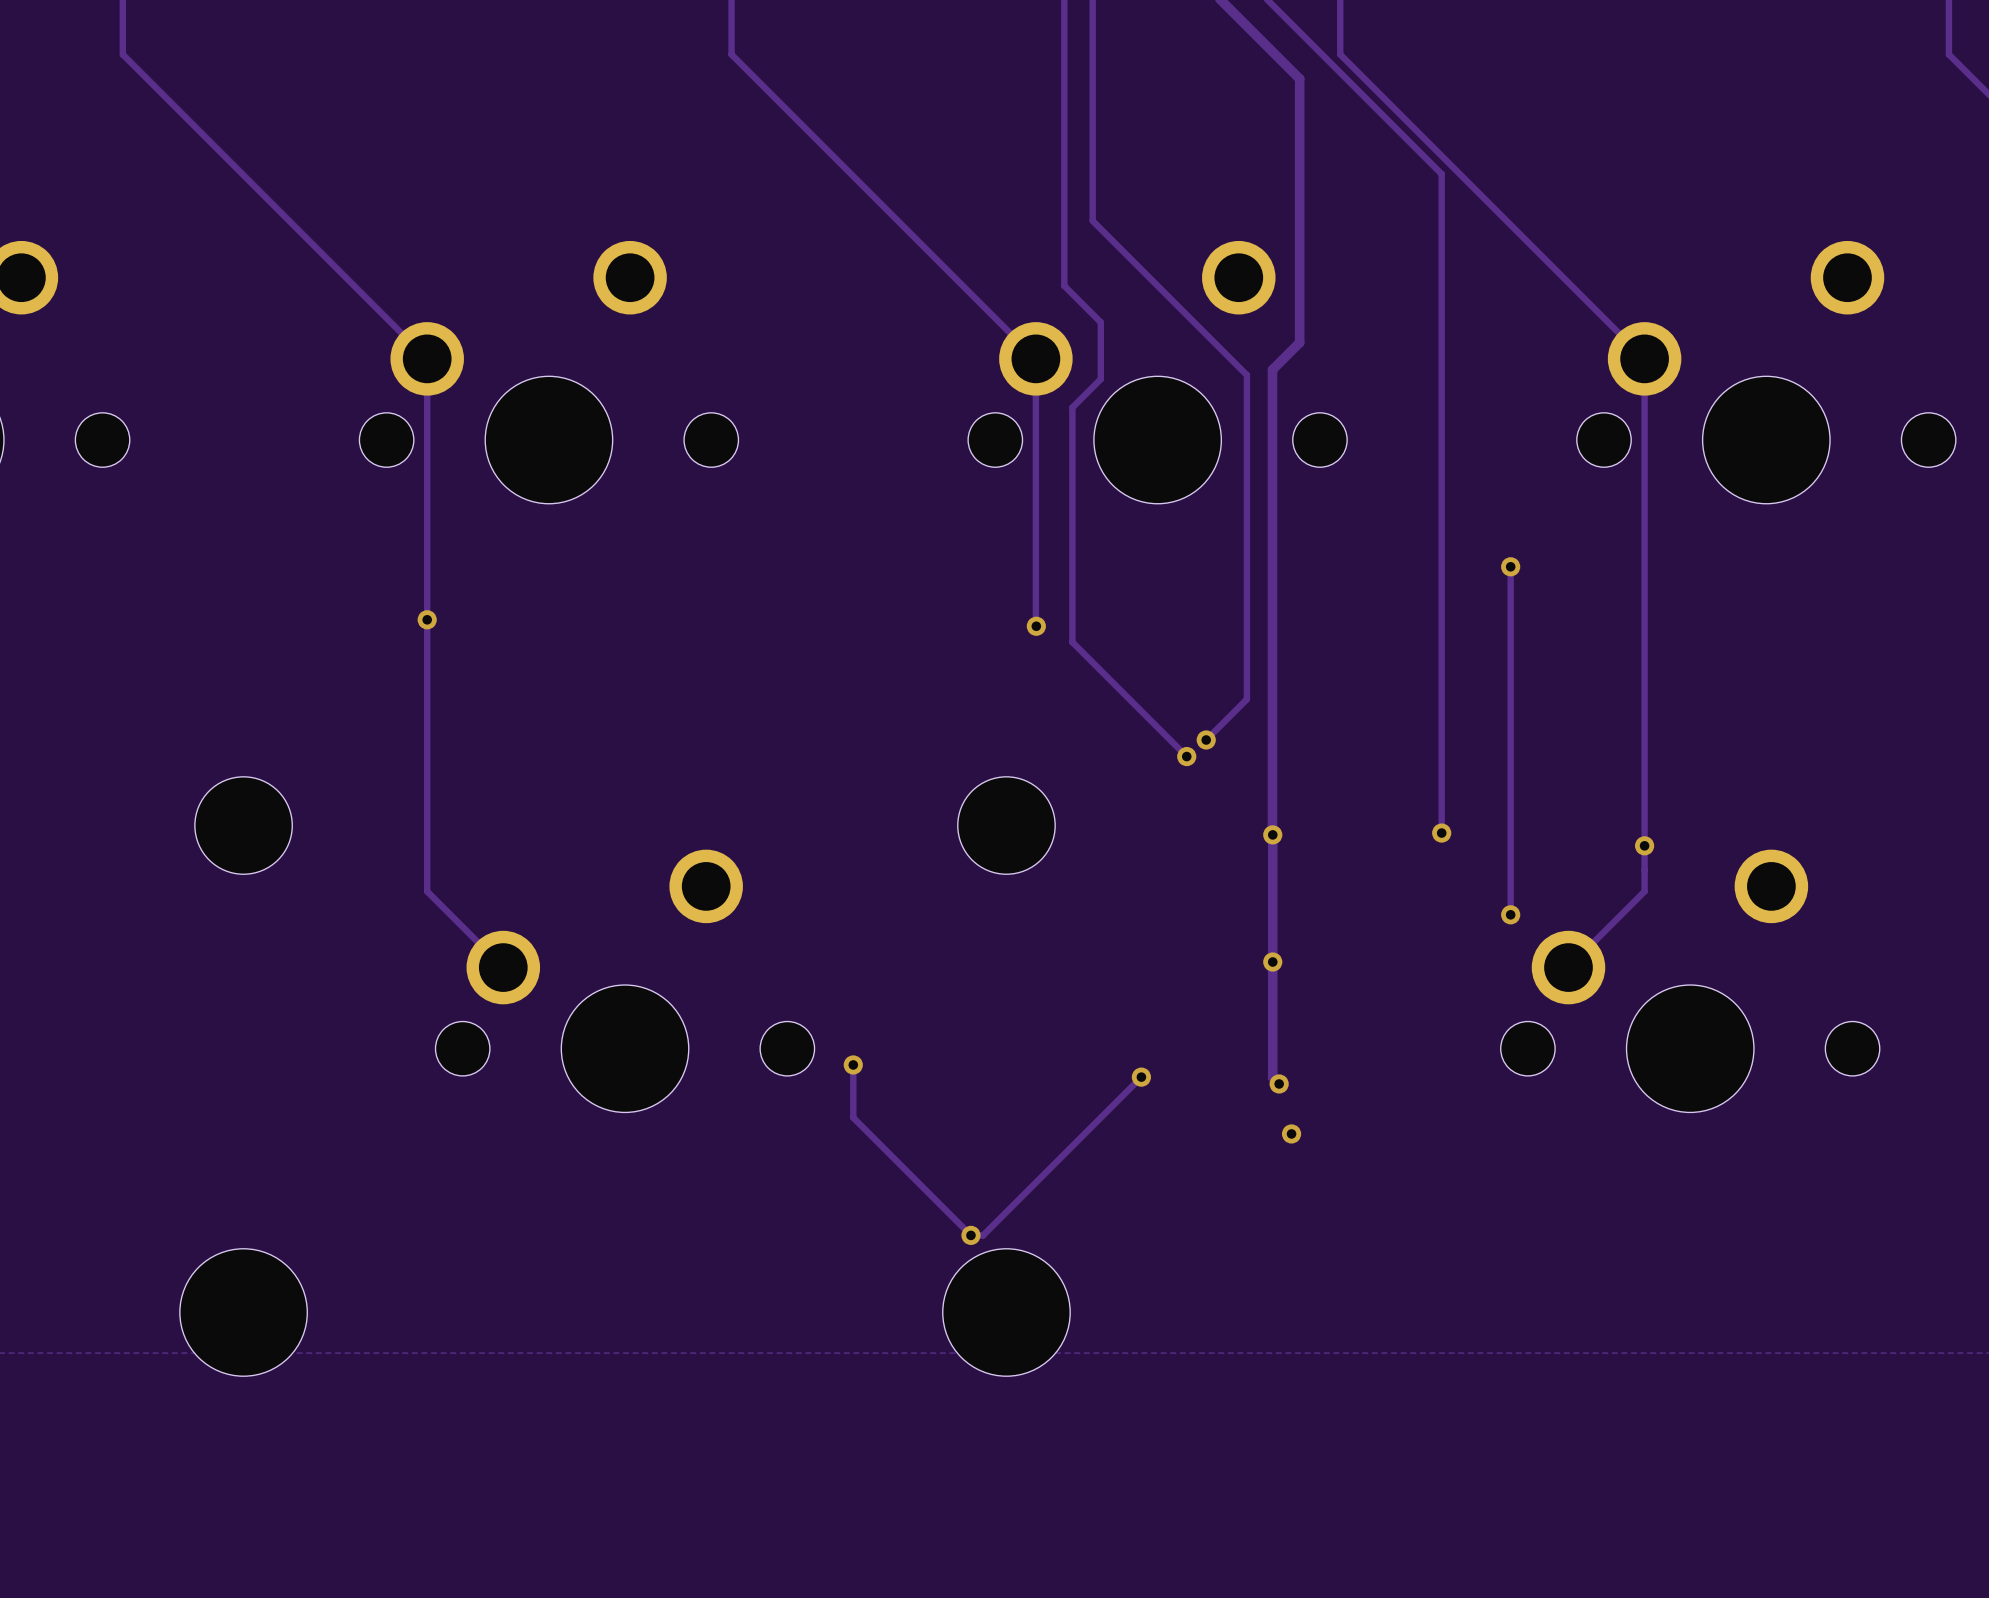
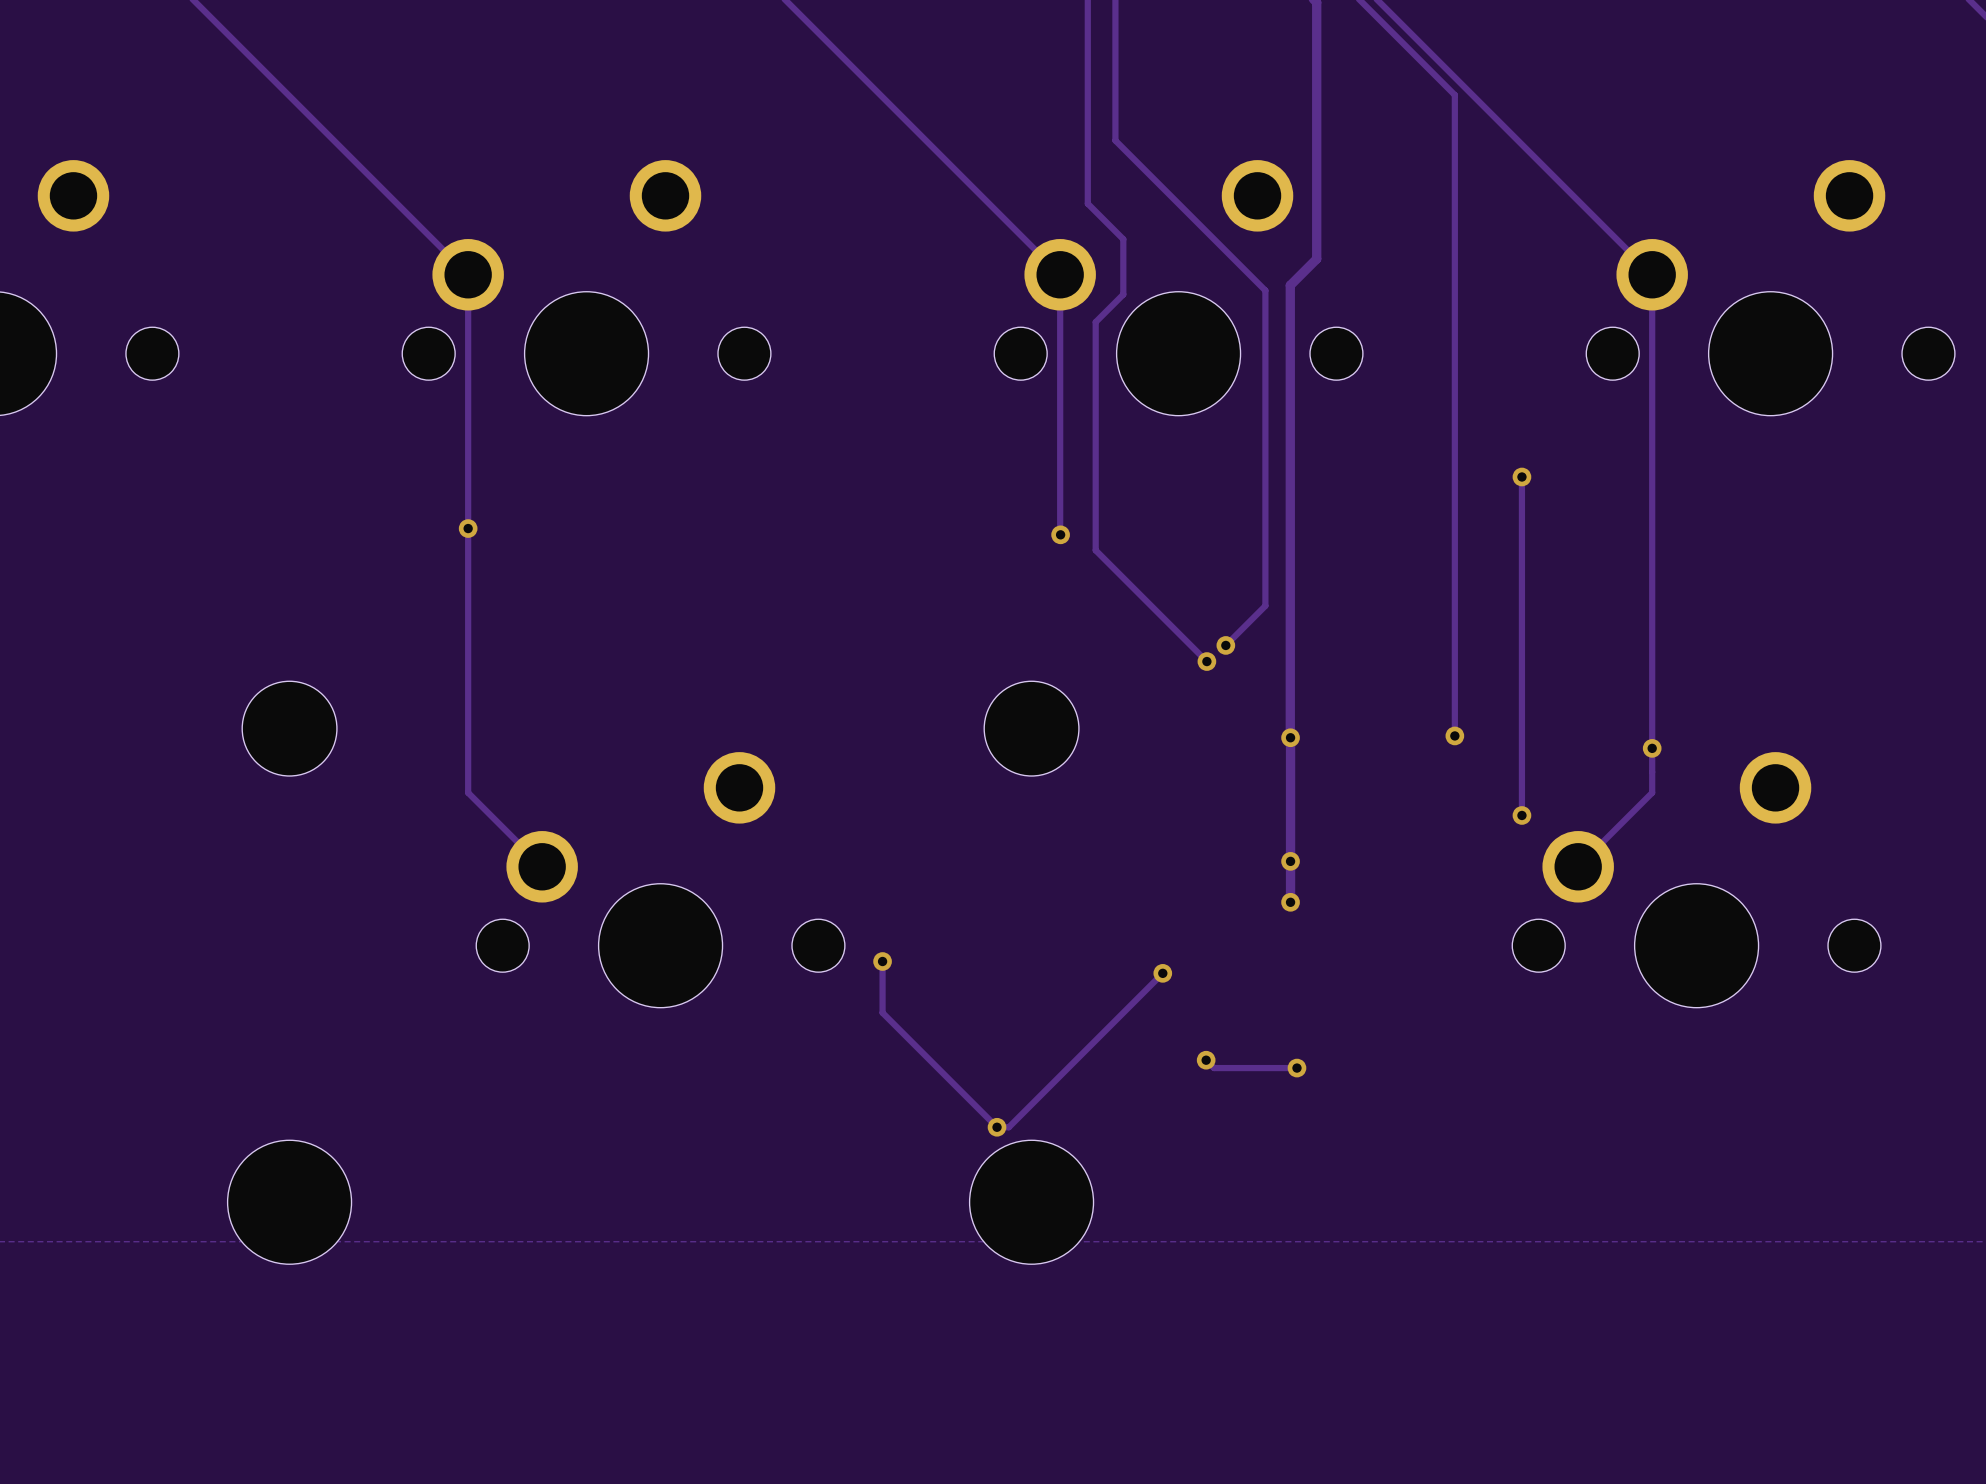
track: (1272, 1004) (1272, 1077) (1279, 1083) -> none
via: none -> (1290, 902)
via: (1279, 1083) -> none
via position: (1291, 1133) -> (1296, 1068)
track: none -> (1206, 1060) (1214, 1068) (1296, 1068)
via: none -> (1206, 1060)

